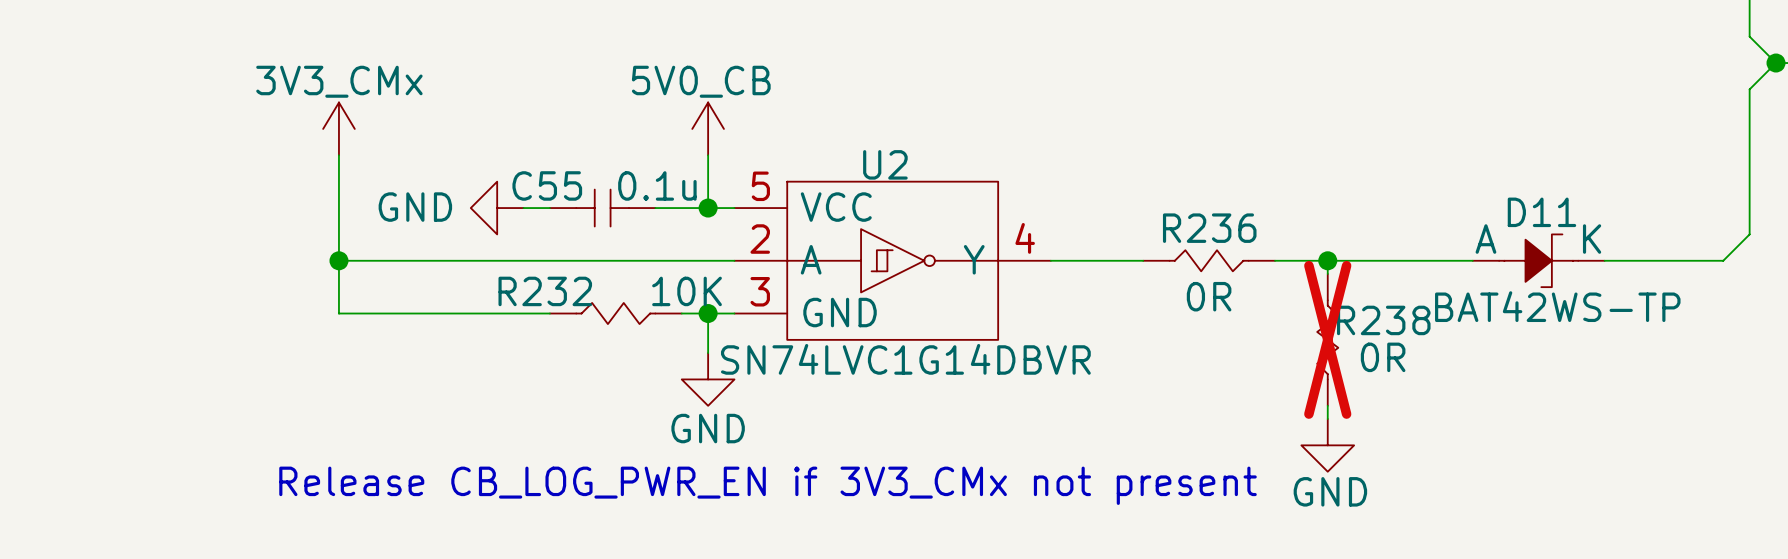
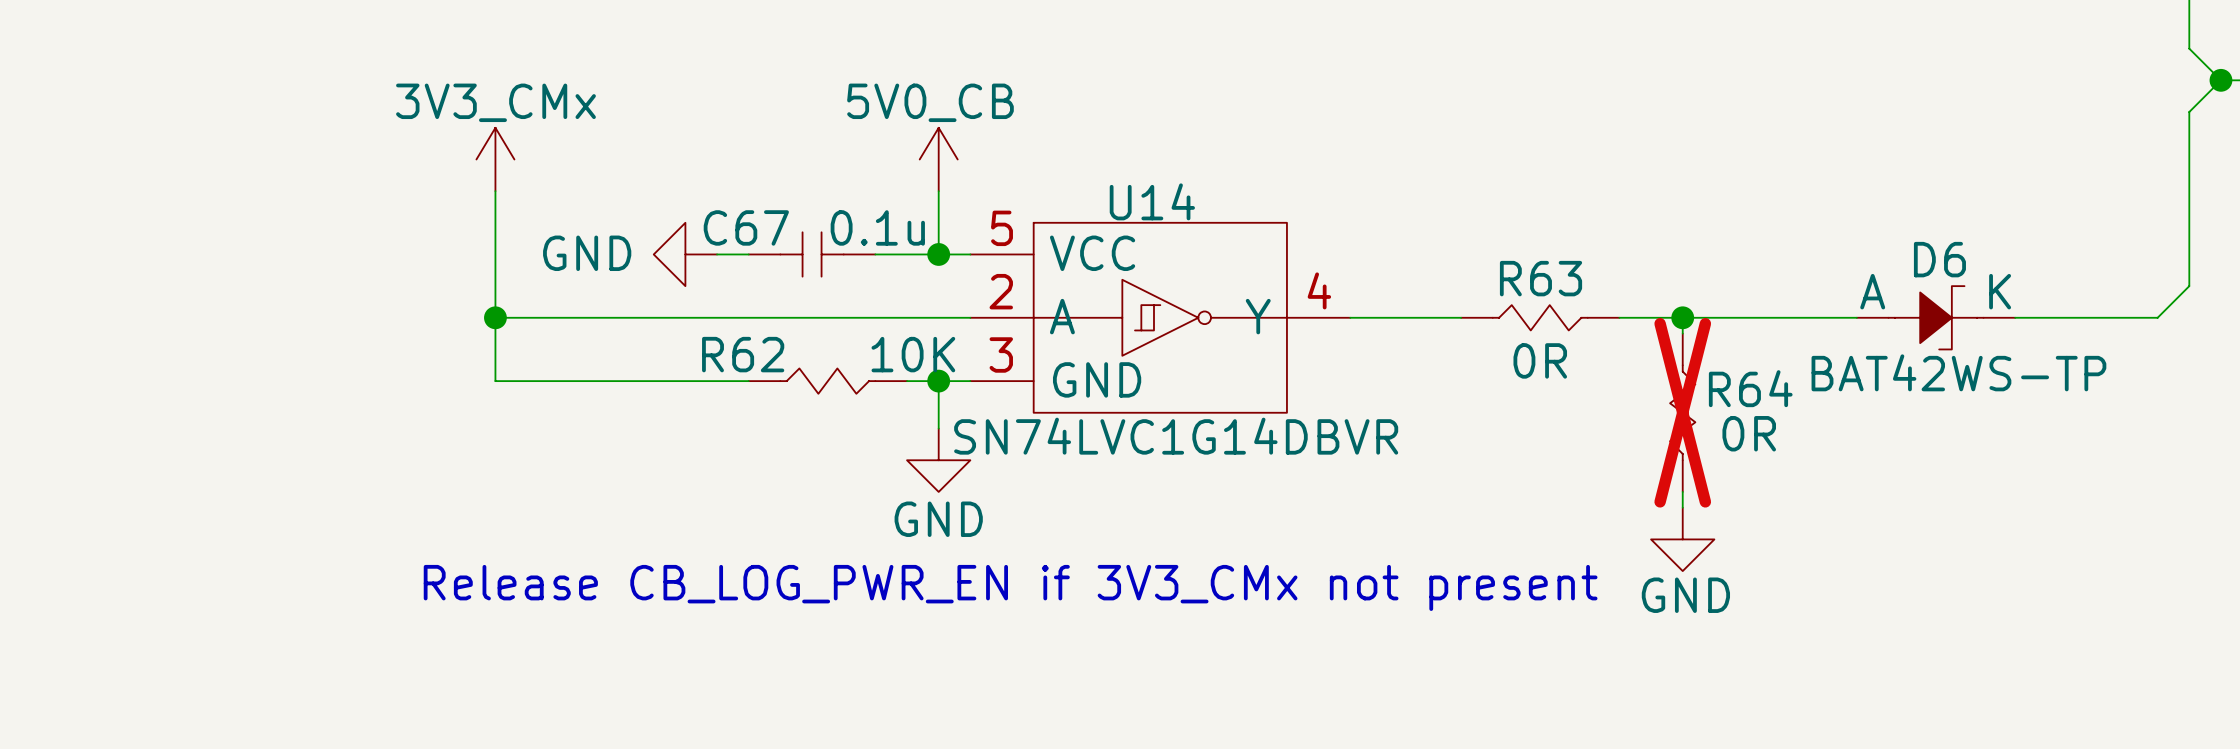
U2 name: U2 (885, 164) -> U14 (1152, 201)
C55 name: C55 (547, 185) -> C67 (746, 227)
D11 name: D11 (1541, 212) -> D6 (1939, 259)
R236 name: R236 (1209, 228) -> R63 (1541, 278)
R232 name: R232 (545, 291) -> R62 (743, 354)
R238 name: R238 (1383, 320) -> R64 (1750, 388)

